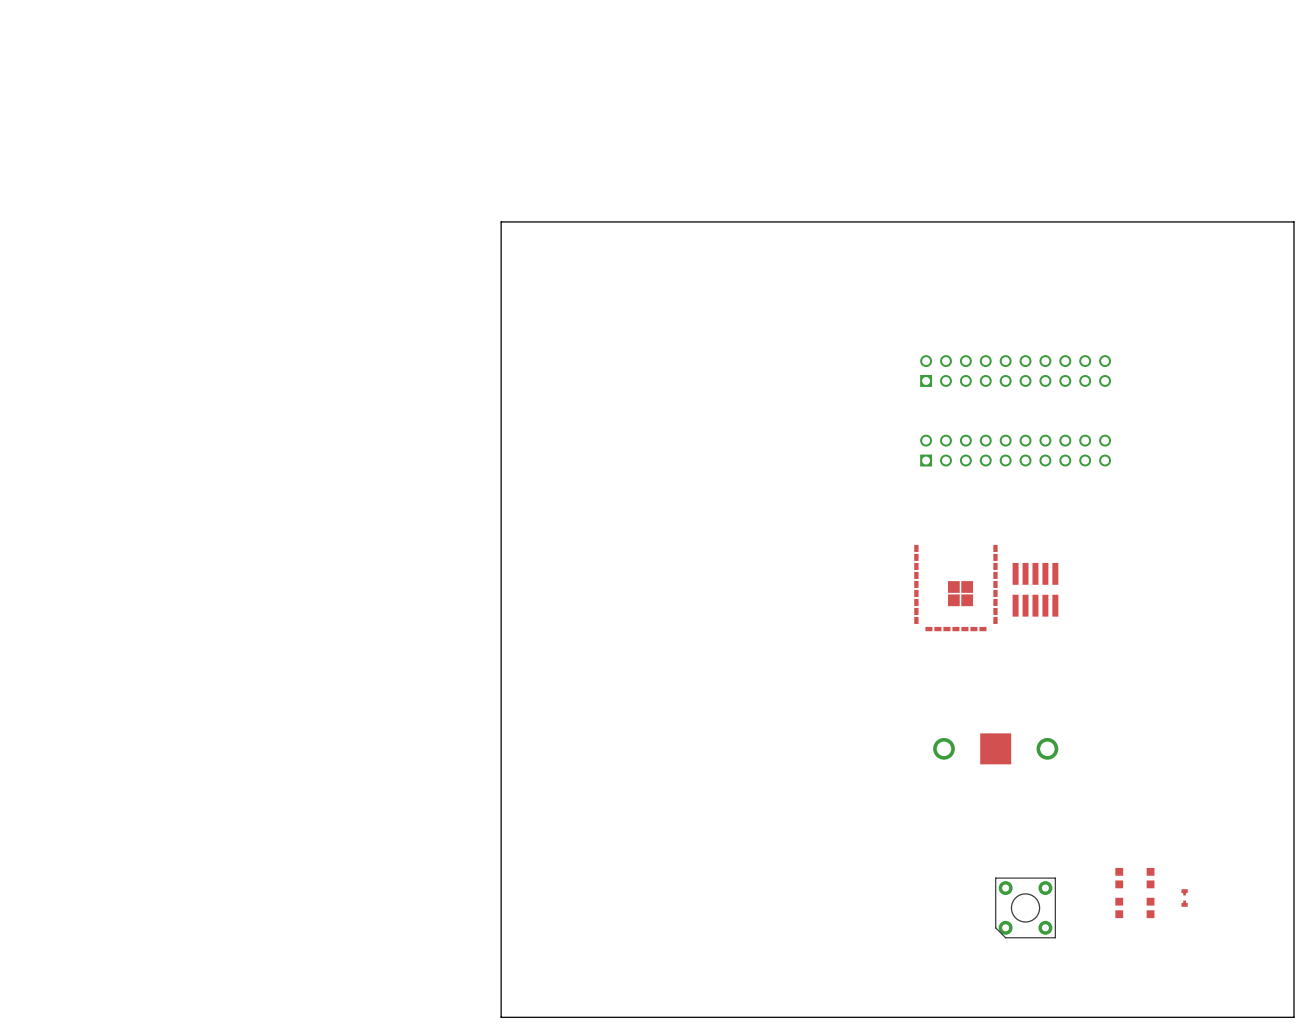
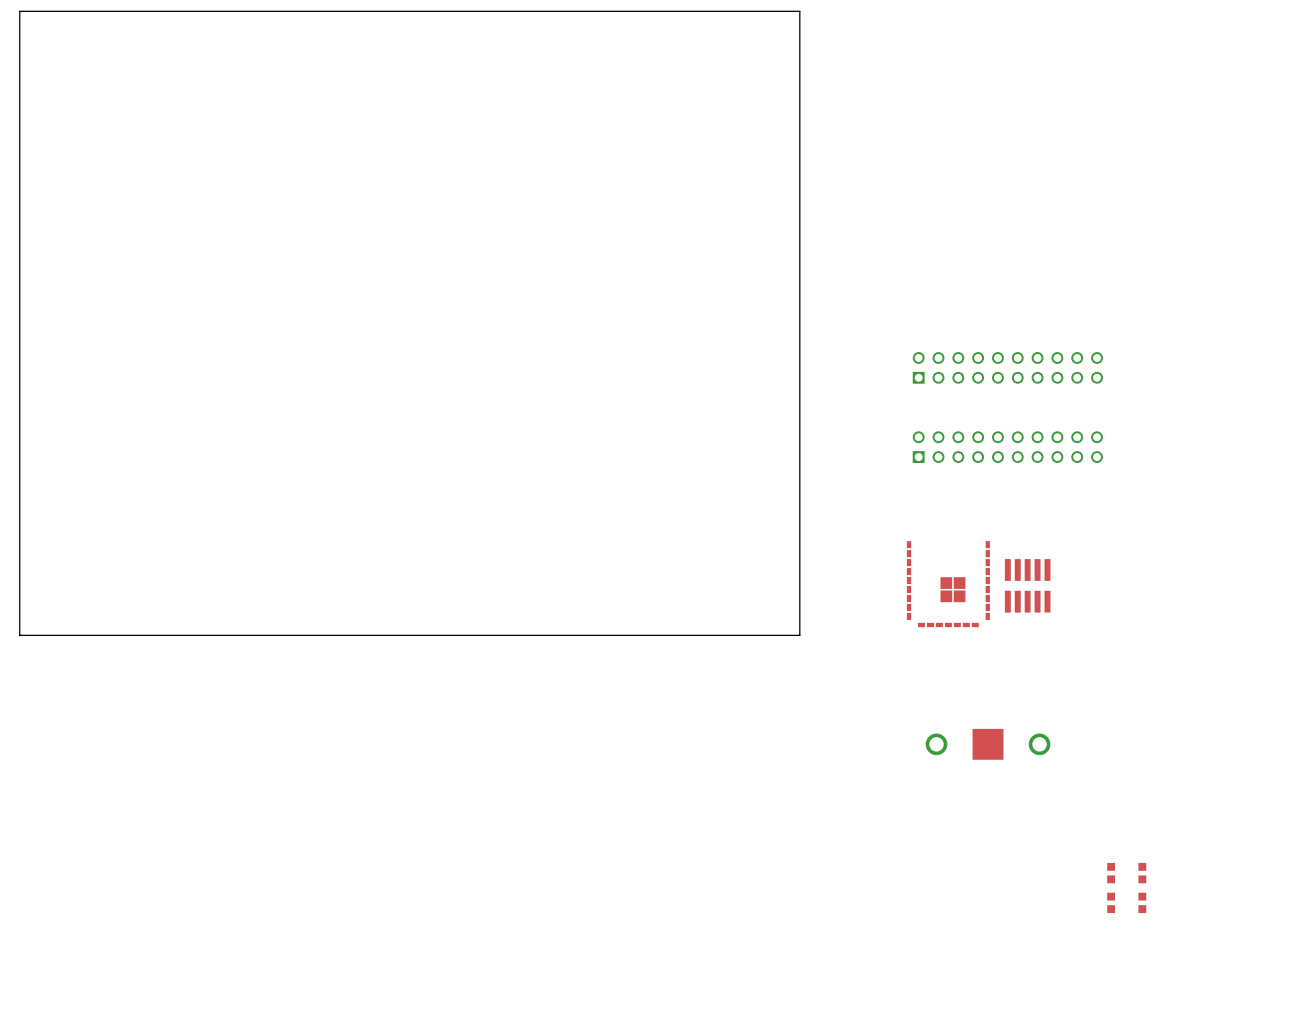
board edge: none -> (799, 11) (19, 11) (19, 635) (799, 635) (799, 11)
board edge: (1293, 221) (501, 221) (501, 1017) (1293, 1017) (1293, 221) -> none
part: (1184, 897) -> none
part: (1025, 907) -> none

